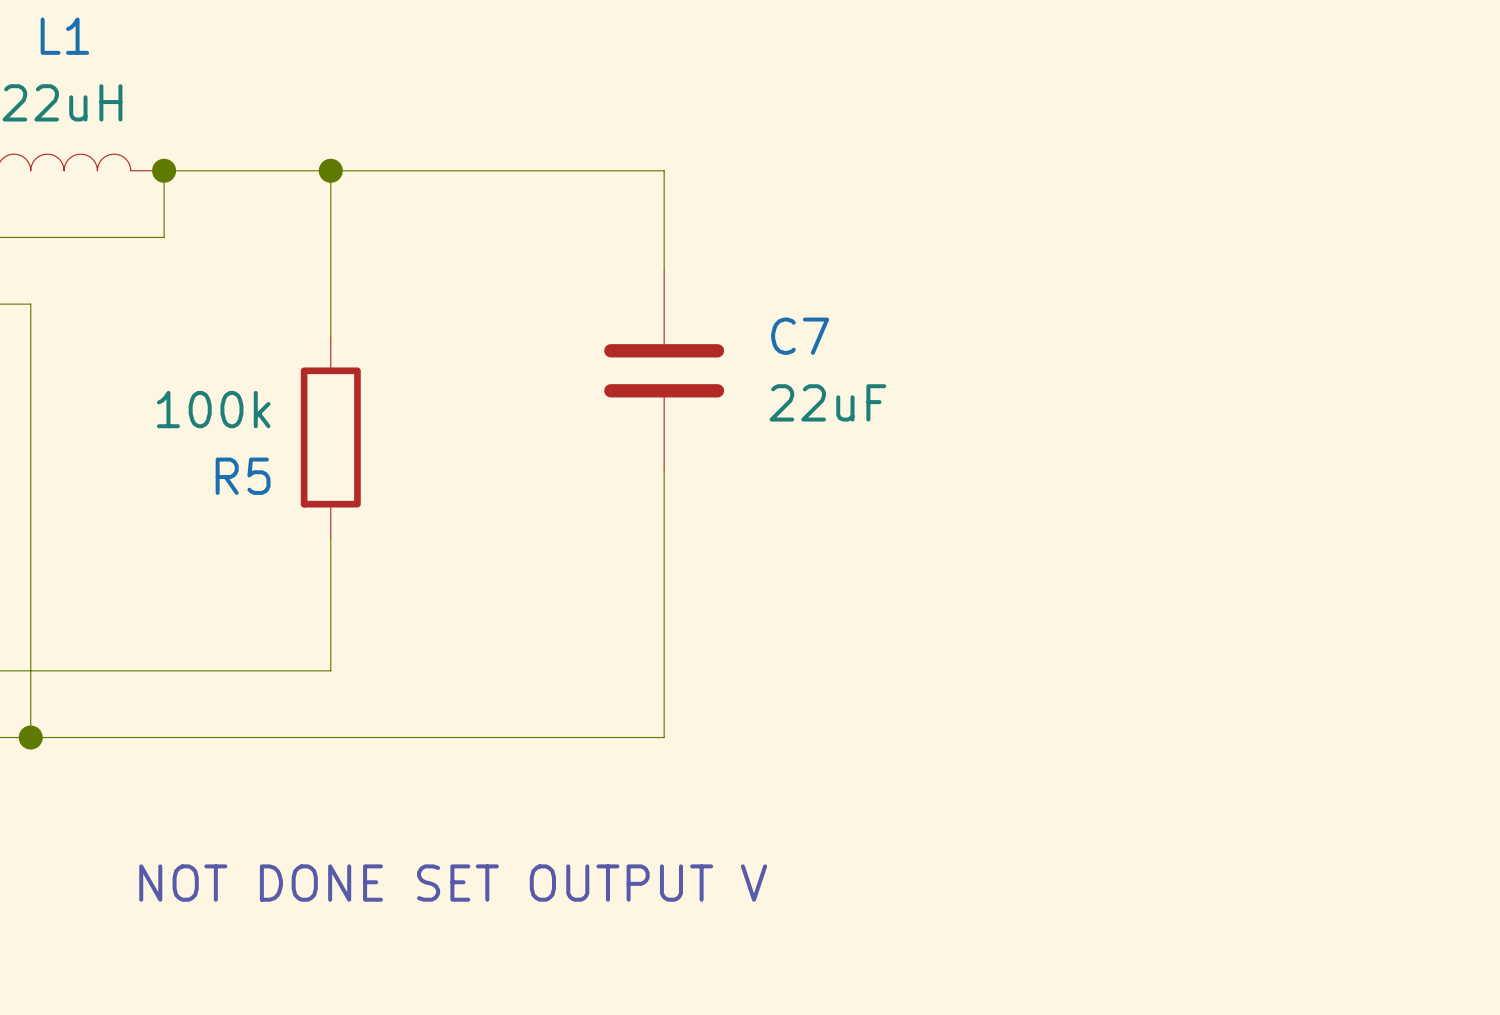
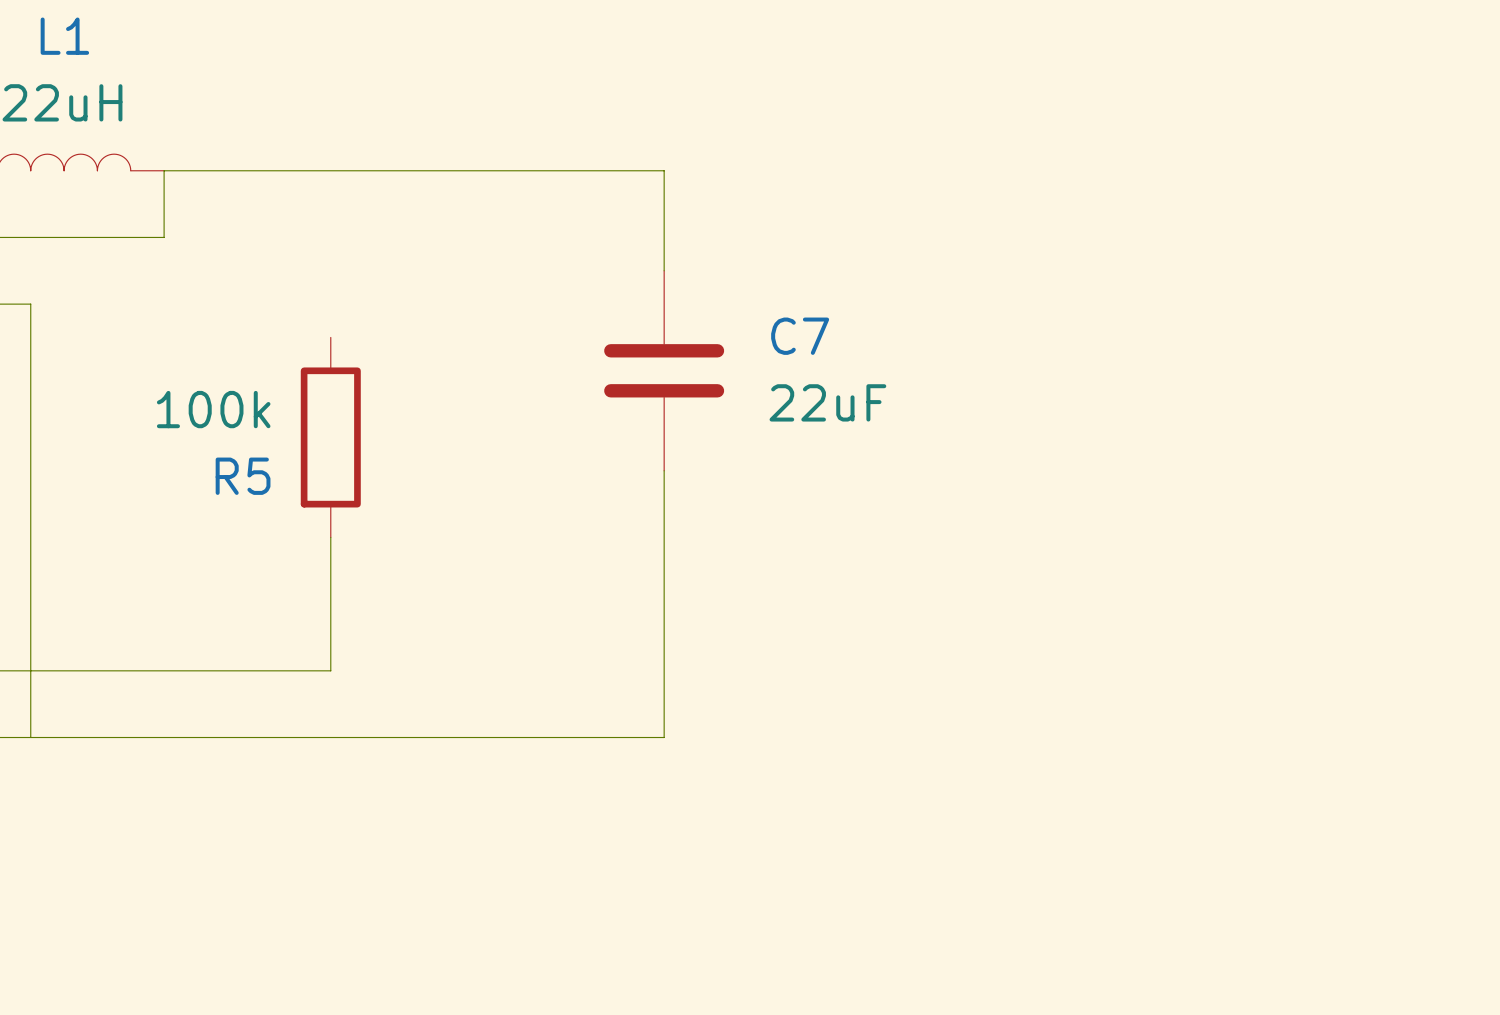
junction: (164, 170) -> none
wire: (330, 170) (330, 337) -> none
junction: (330, 170) -> none
junction: (30, 737) -> none
text: NOT DONE SET OUTPUT V (453, 883) -> none

